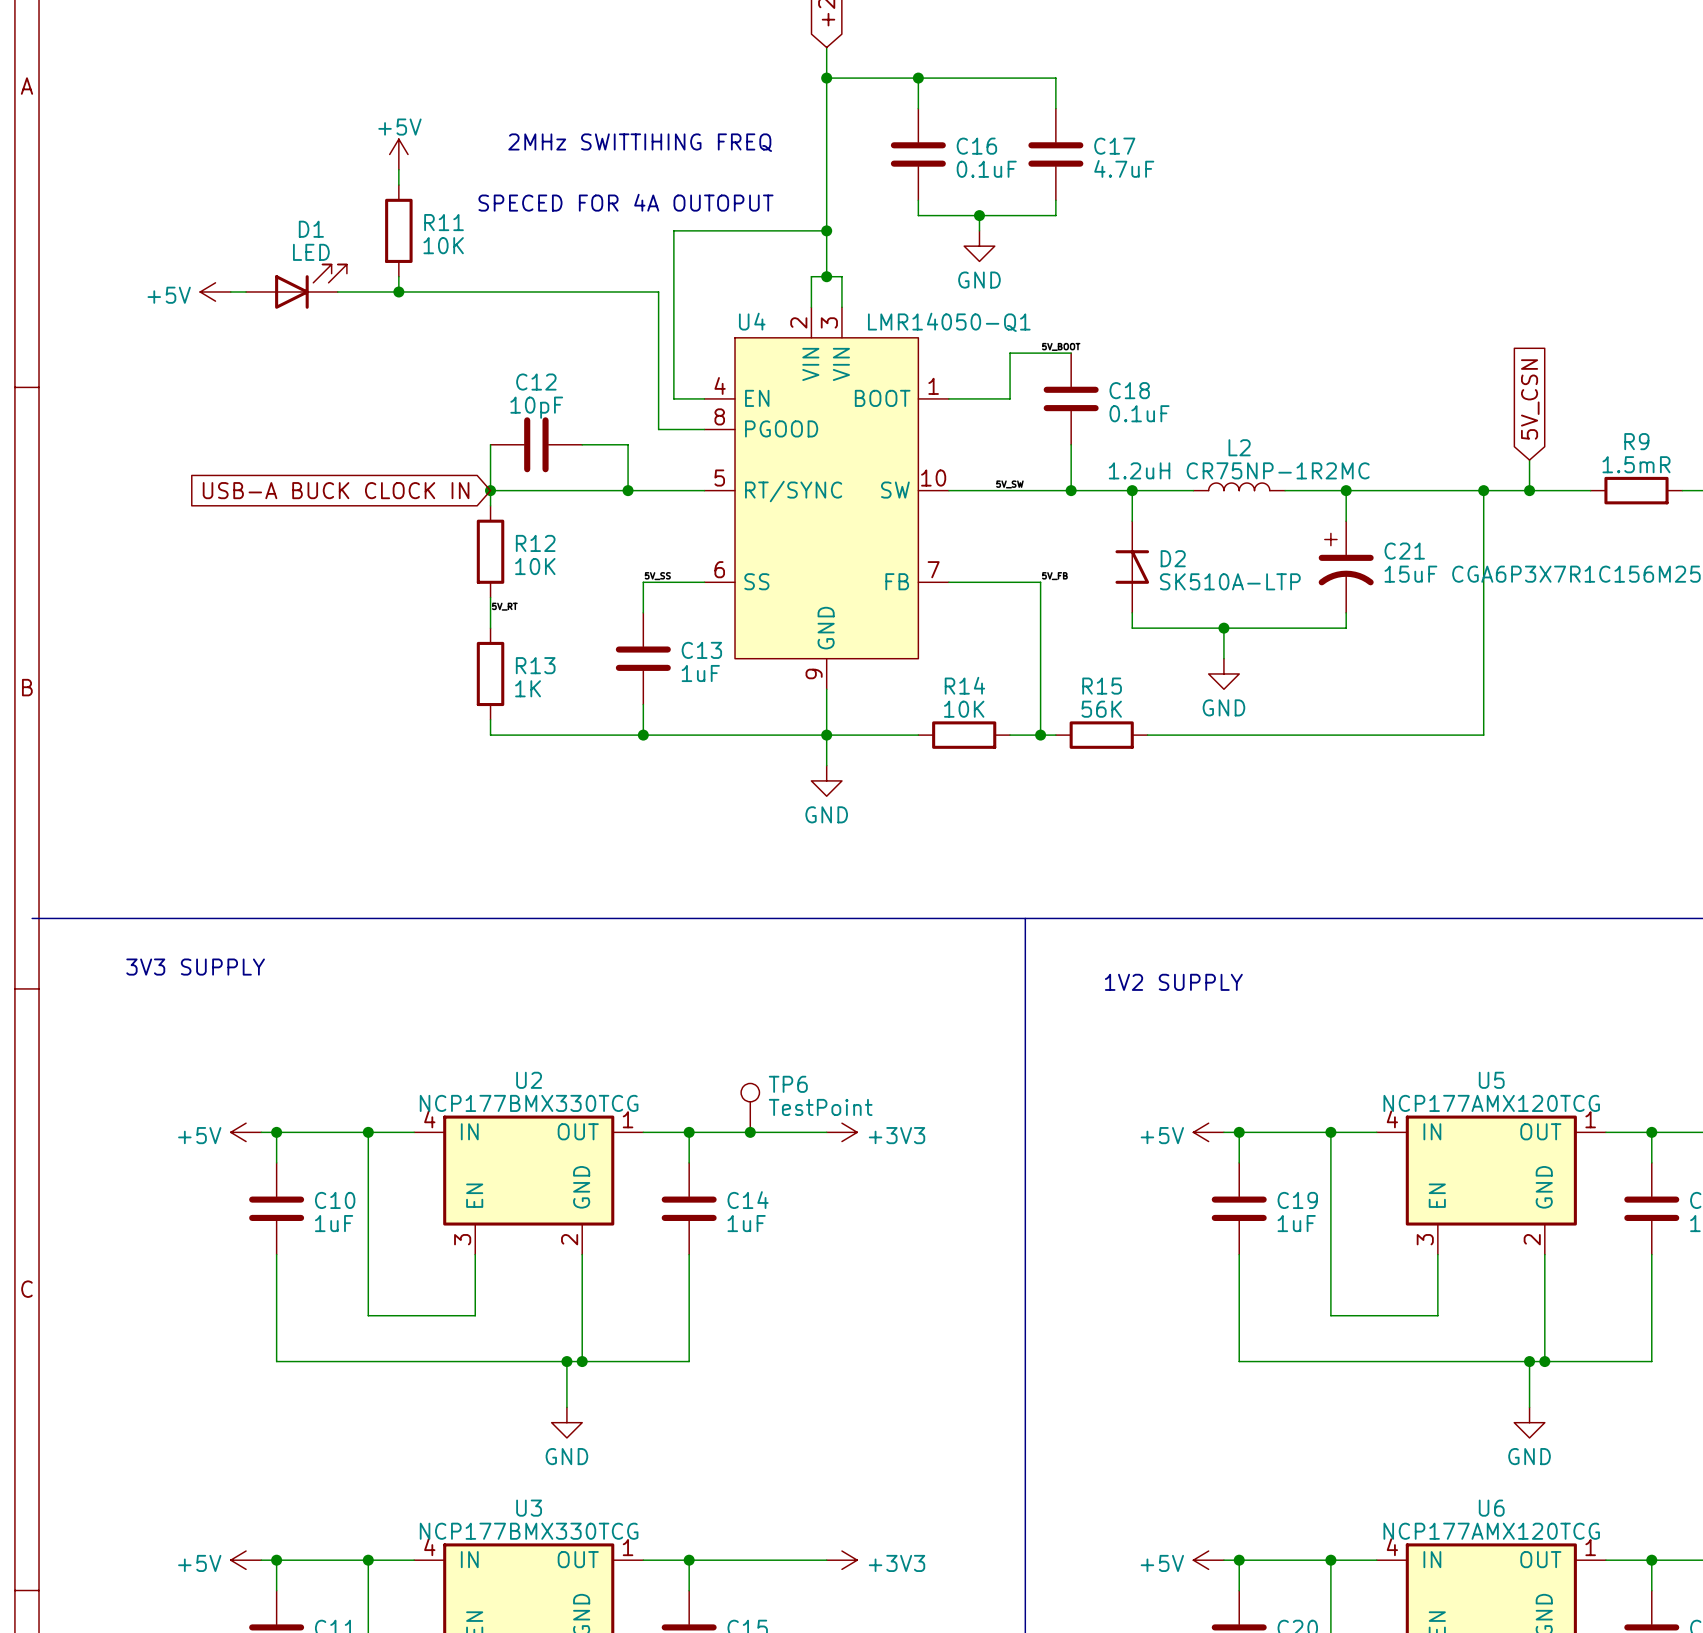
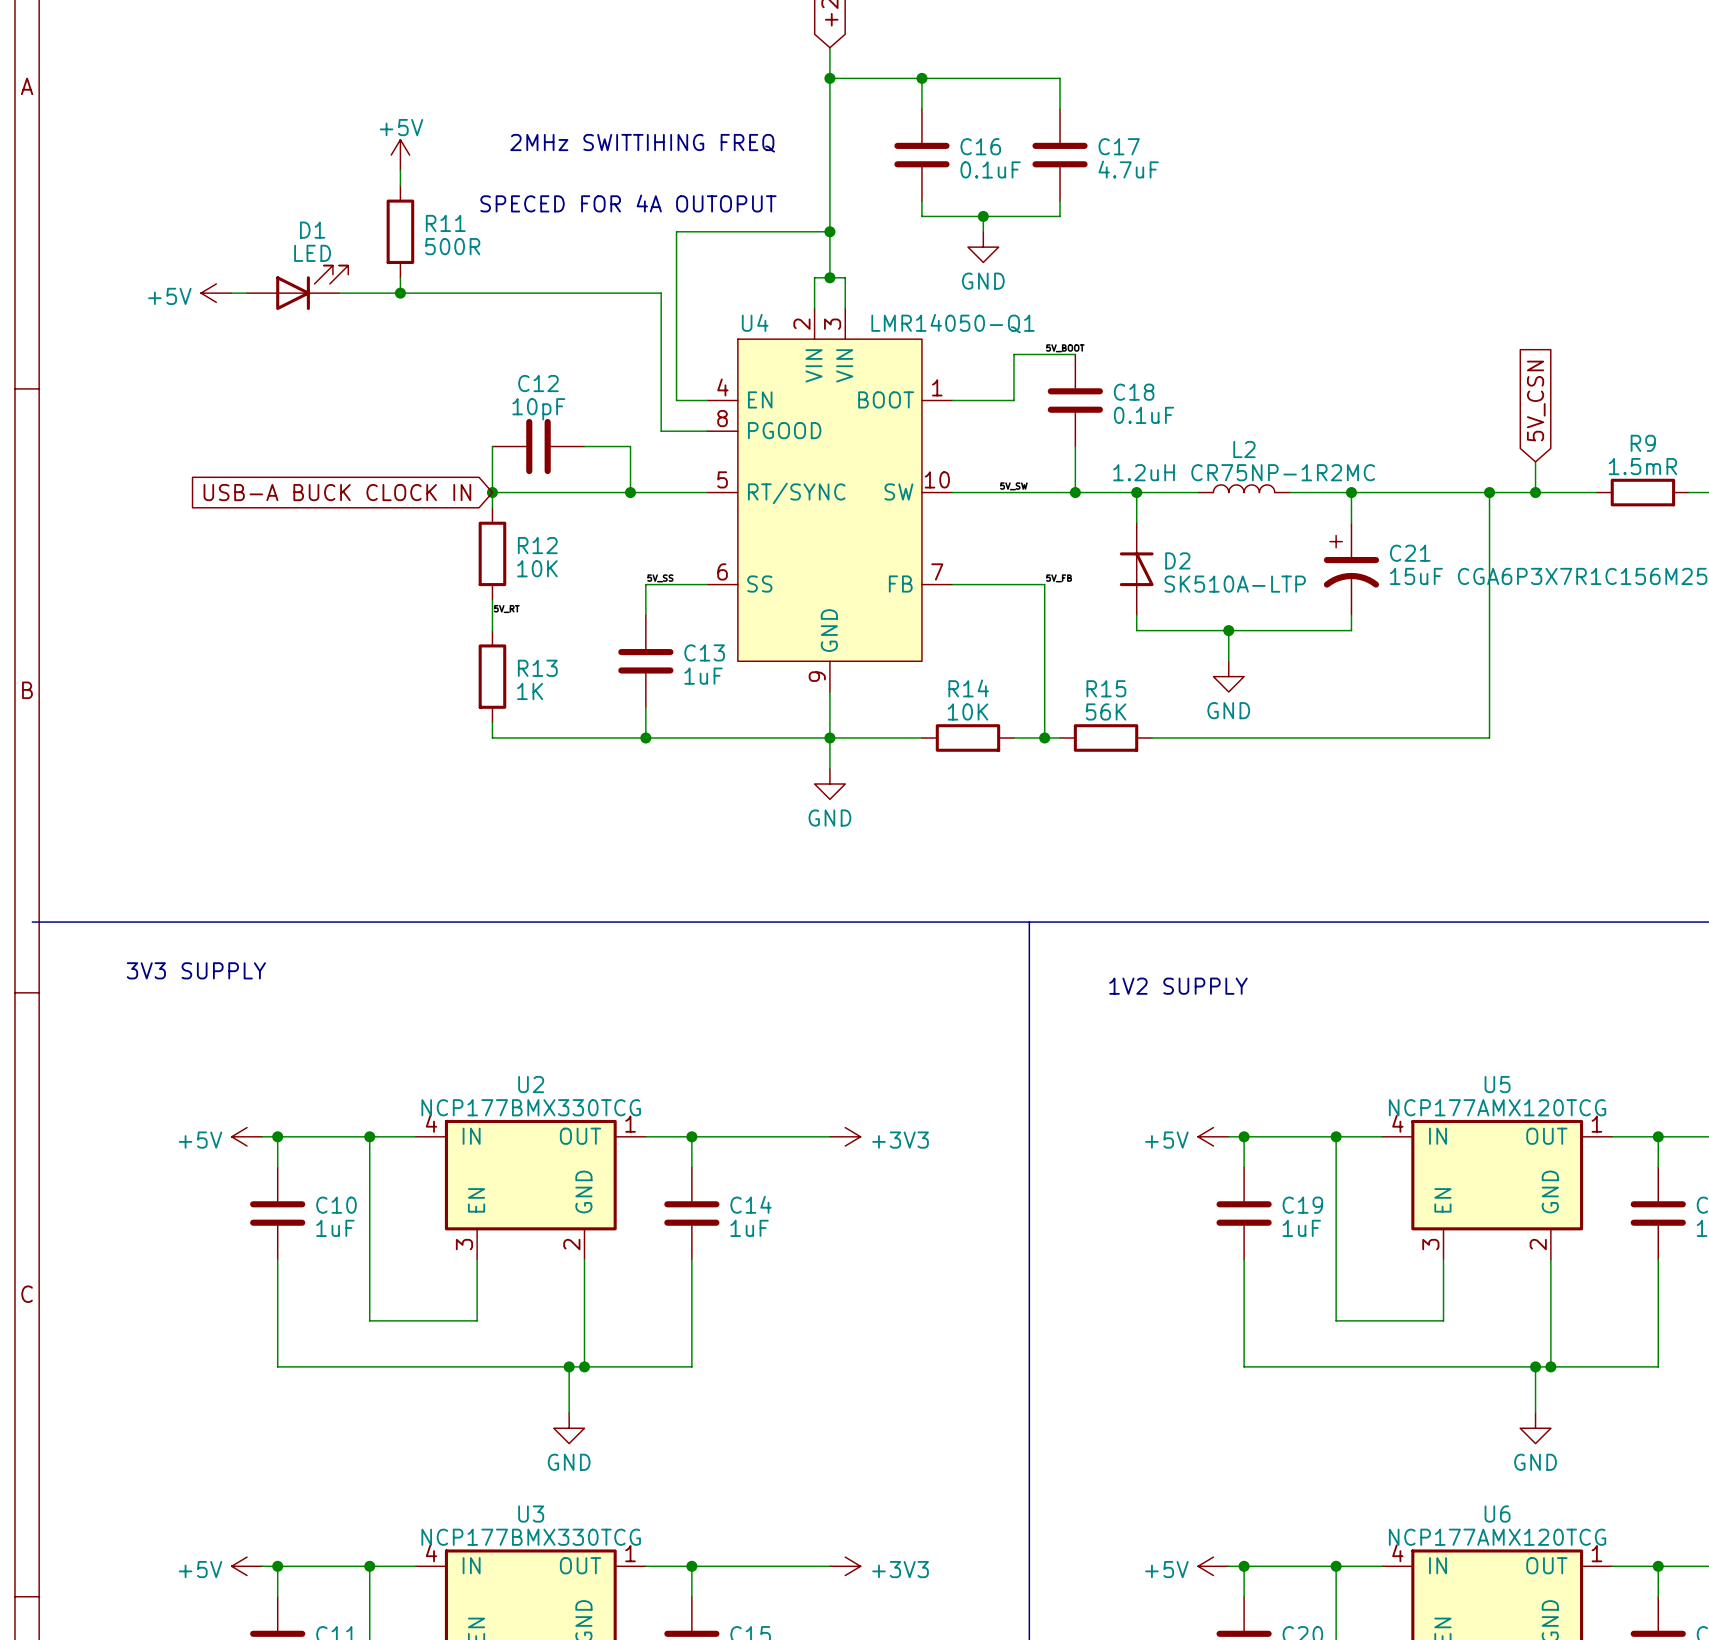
R11 value: 10K (443, 245) -> 500R (452, 246)
TP6: TestPoint (750, 1107) -> none
junction: (750, 1132) -> none

